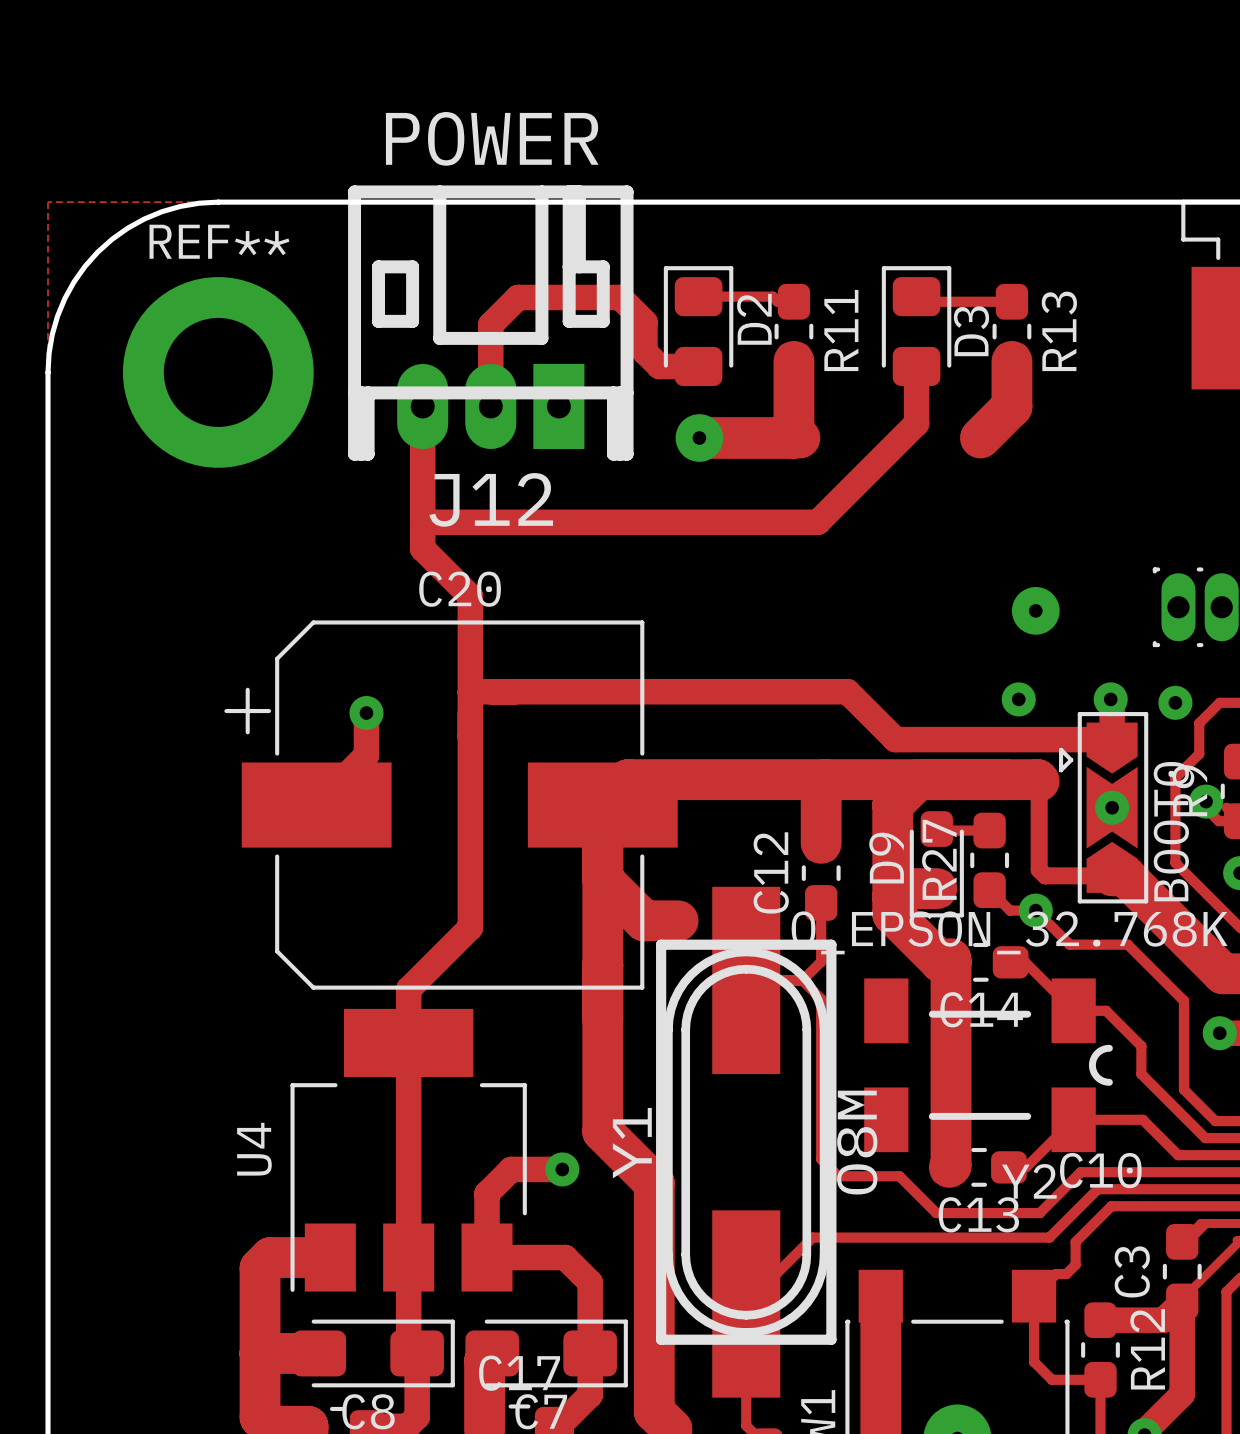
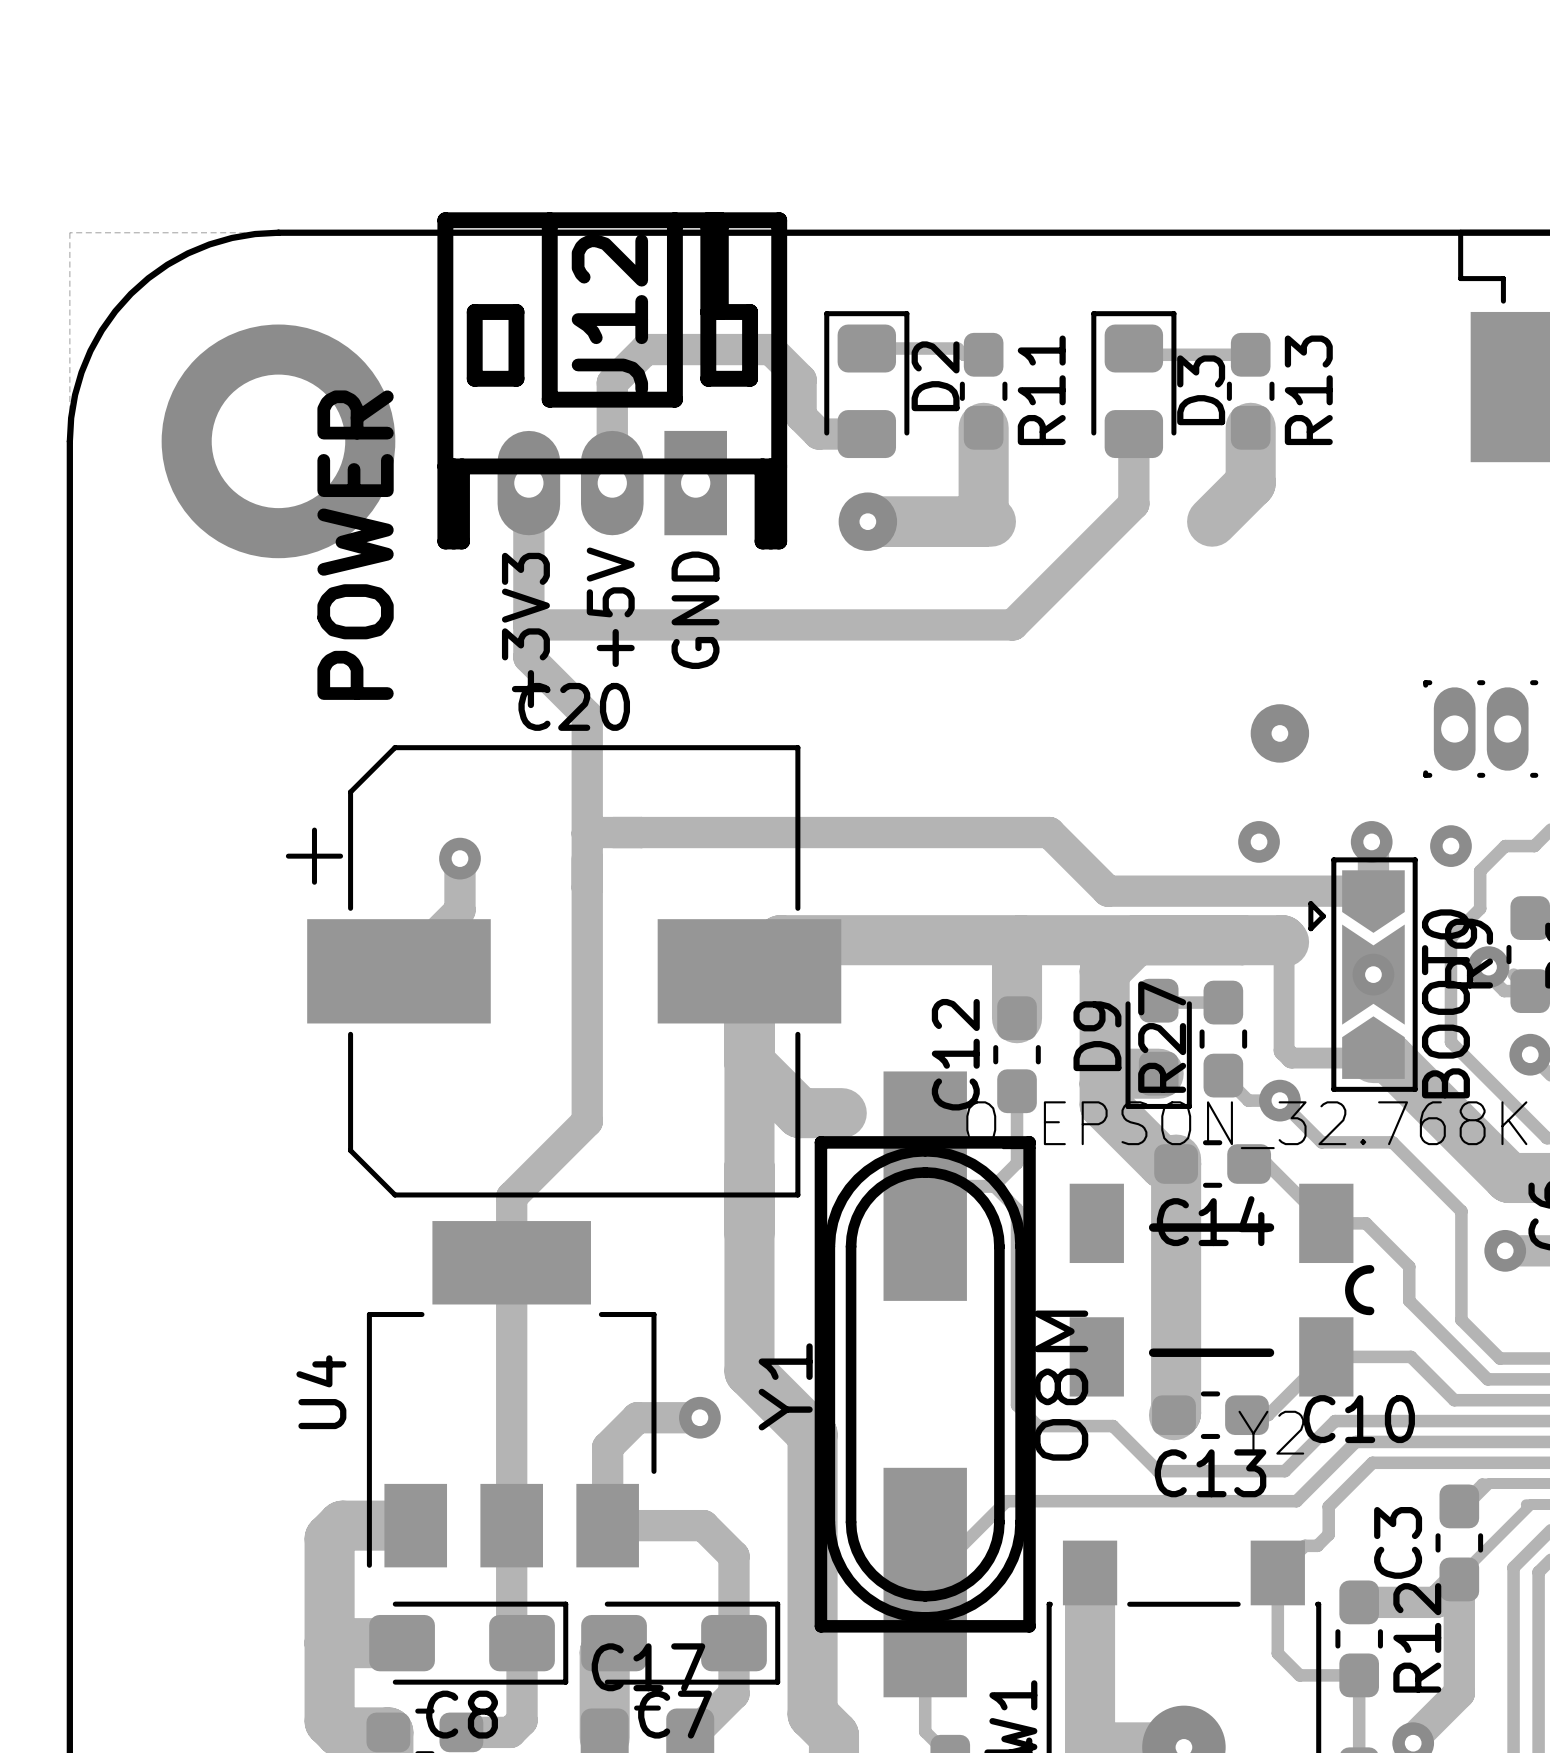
J12 value rotation: 0° (492, 138) -> 90° counterclockwise (355, 545)
J12 value position: POWER (492, 138) -> POWER (355, 545)
REF** name: REF** (219, 241) -> none
J12 name rotation: 0° (491, 499) -> 90° counterclockwise (609, 315)
J12 name position: J12 (491, 499) -> J12 (609, 315)
J12 text: none -> +5V (610, 607)
J12 text: none -> GND (695, 610)
J12 text: none -> +3V3 (525, 630)

